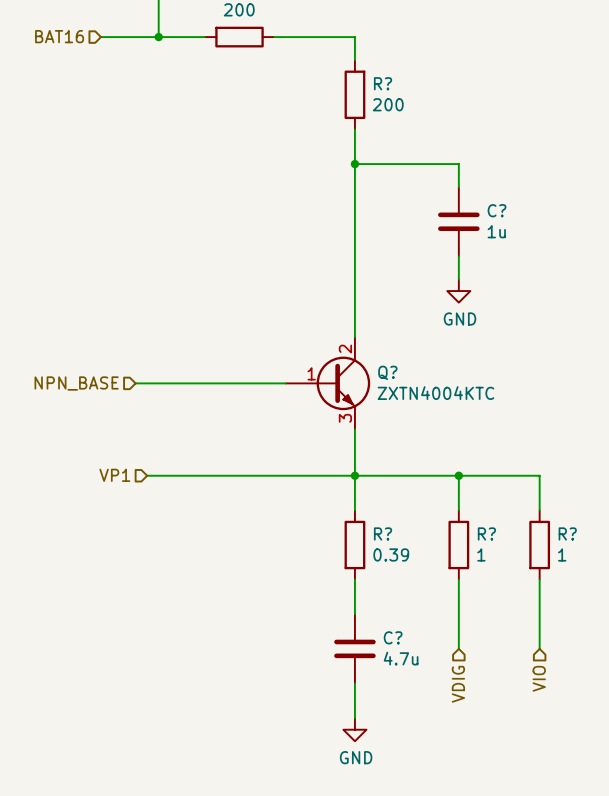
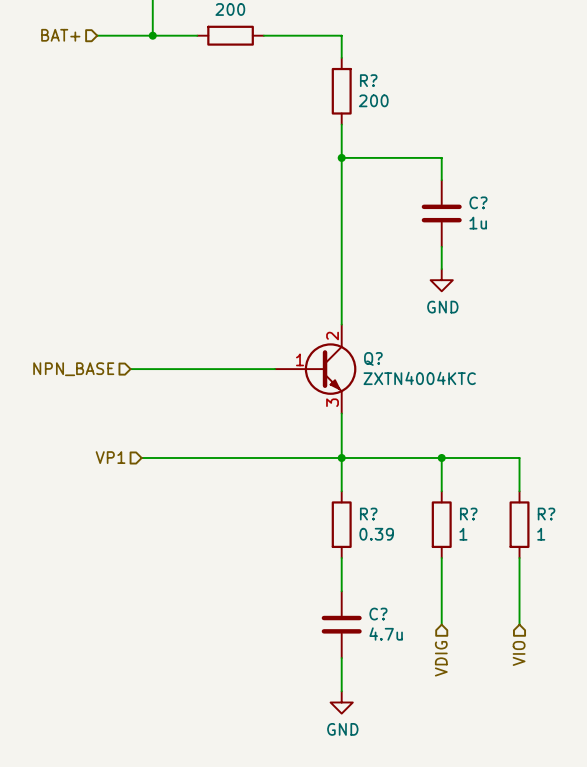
hierarchical label: BAT16 (59, 36) -> BAT+ (60, 35)

